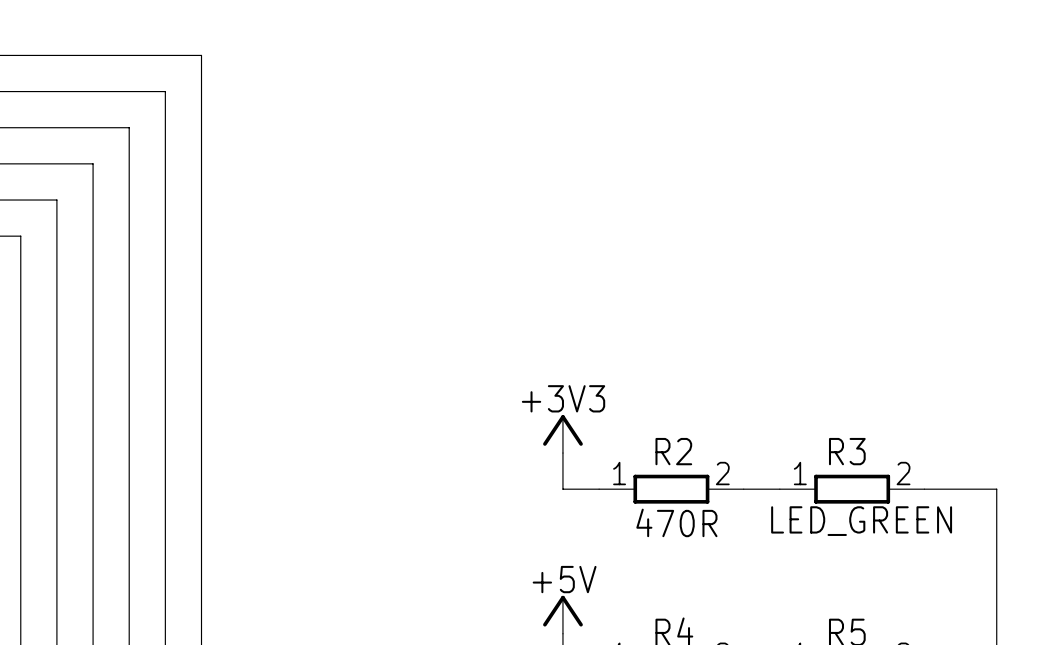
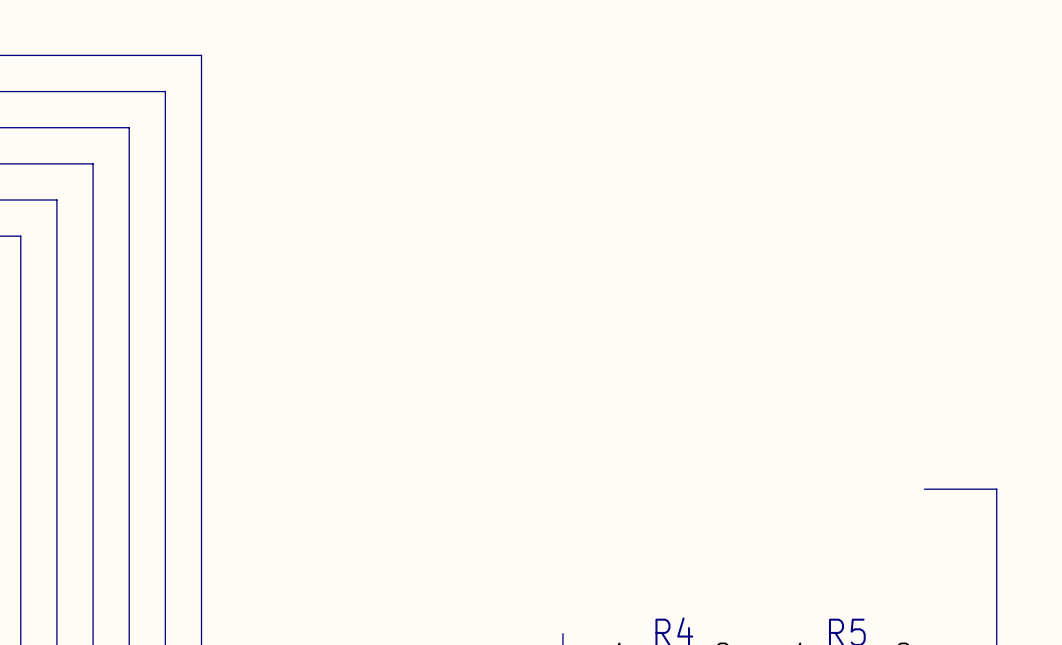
power symbol: +3V3 (562, 434) -> none
wire: (562, 453) (562, 489) (599, 489) -> none
R2: 470R (671, 489) -> none
wire: (743, 489) (779, 489) -> none
R3: LED_GREEN (852, 489) -> none
power symbol: +5V (562, 614) -> none

